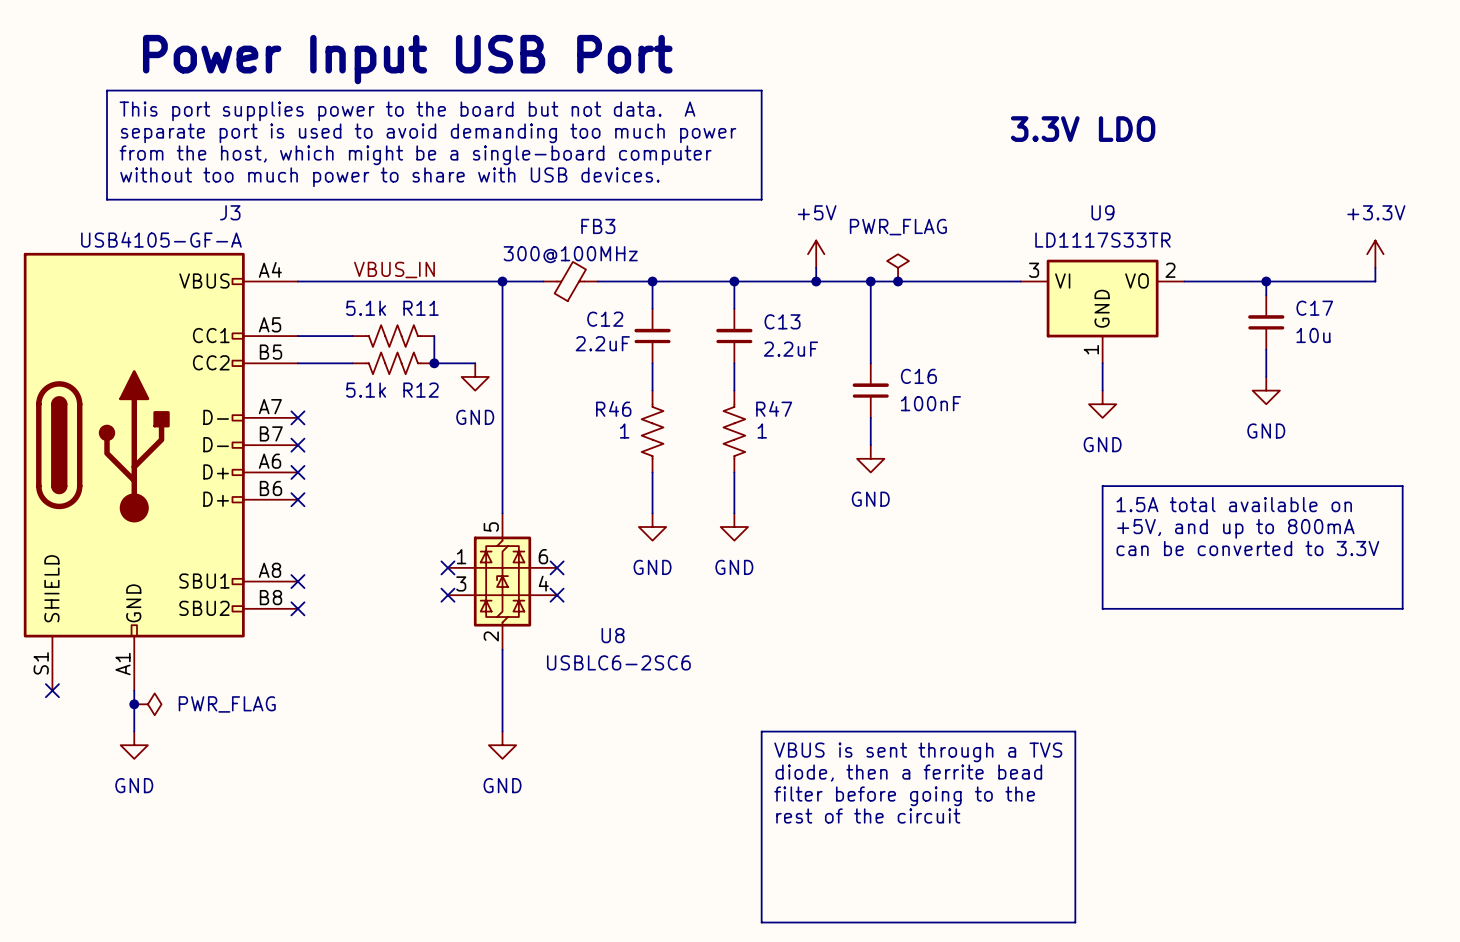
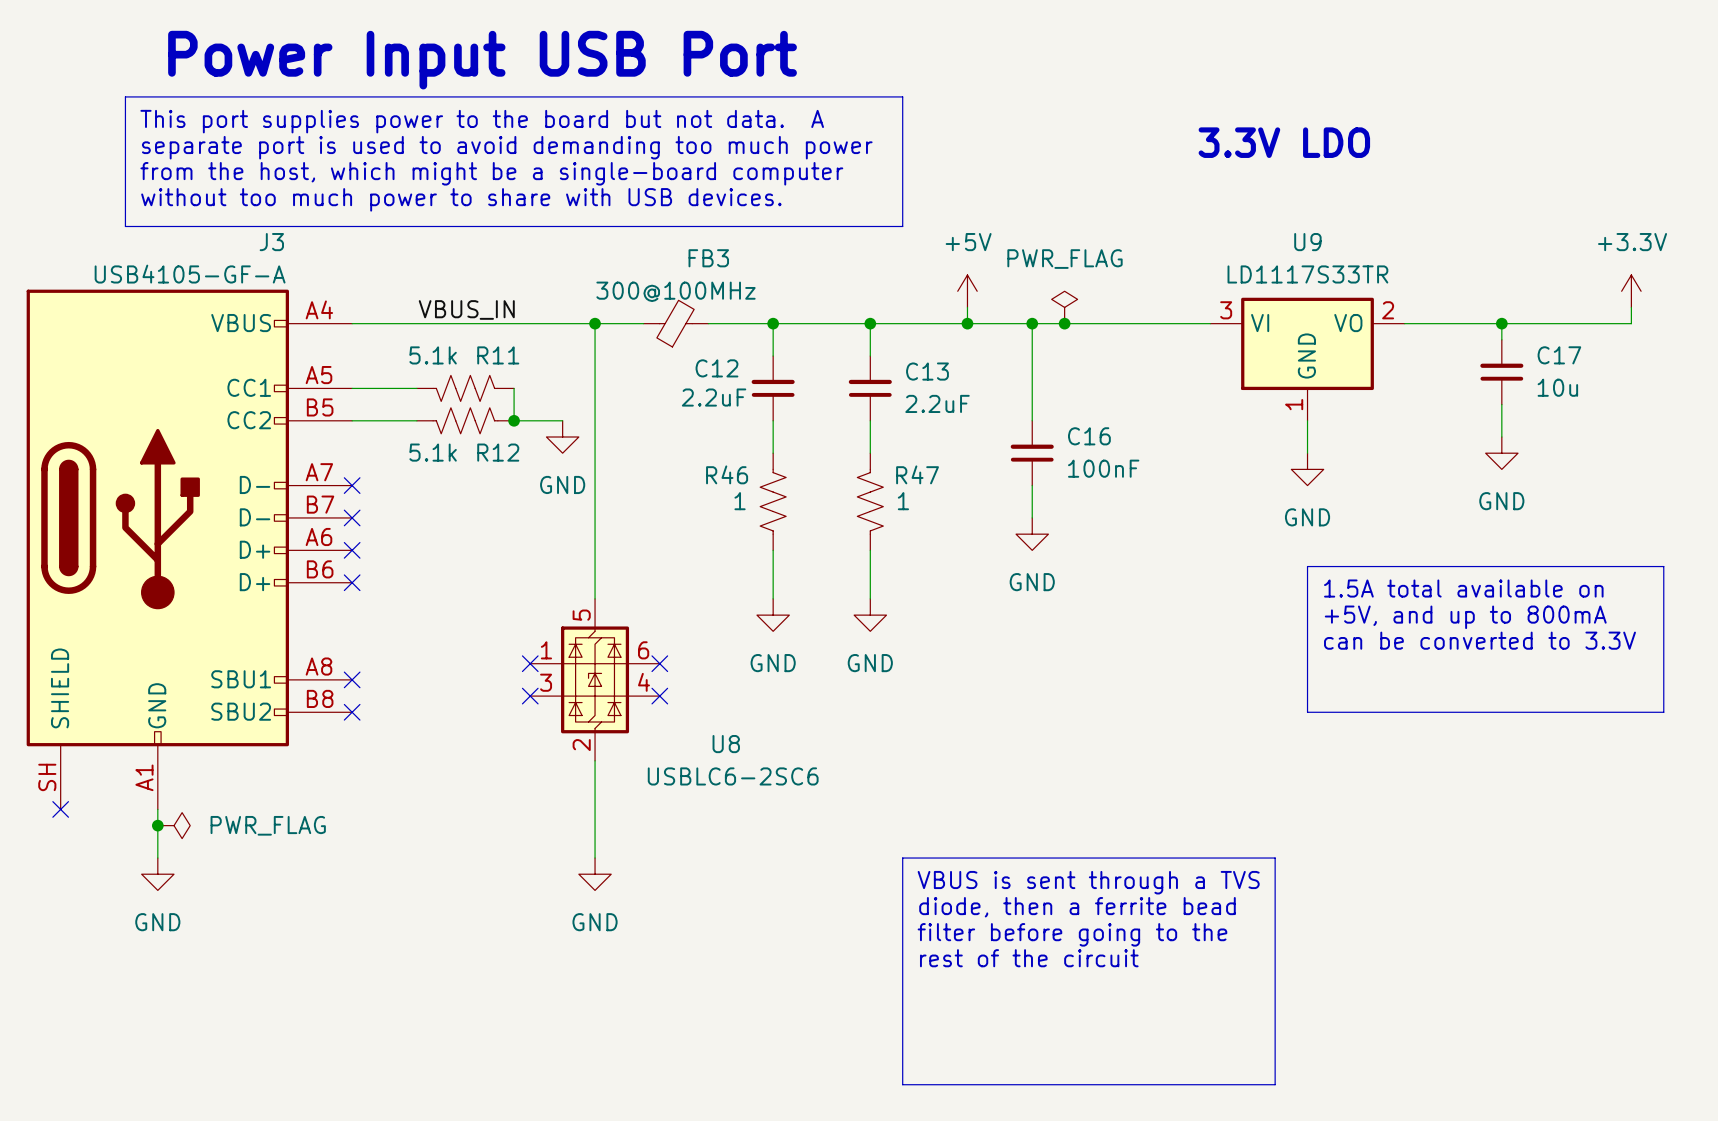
J3 pin number: S1 (41, 663) -> SH (47, 777)

